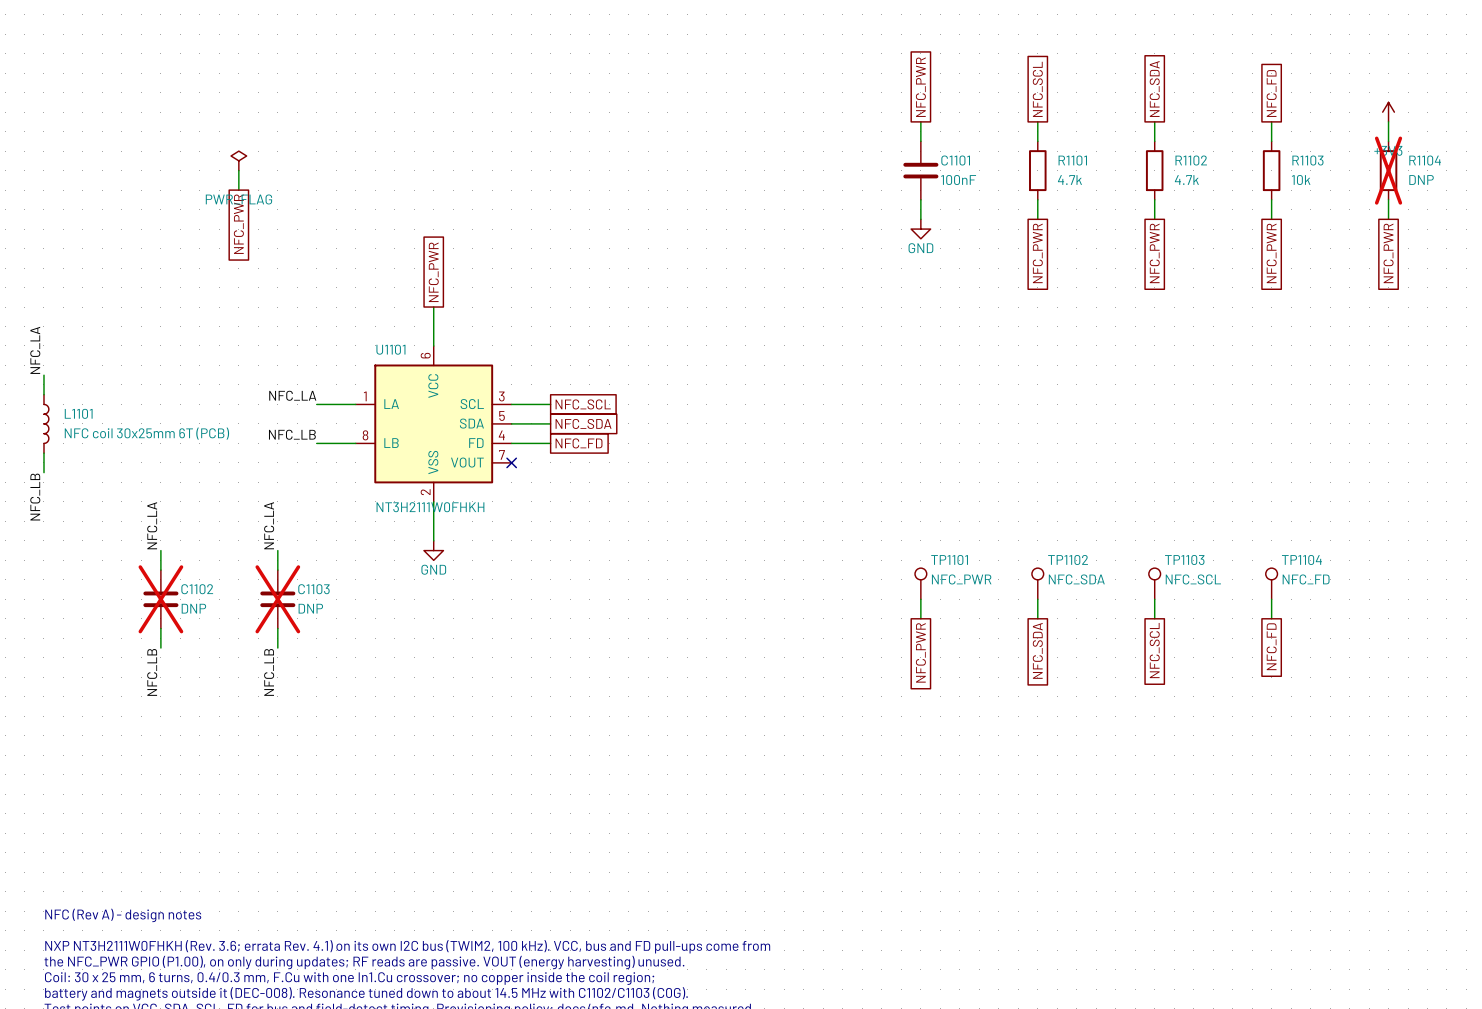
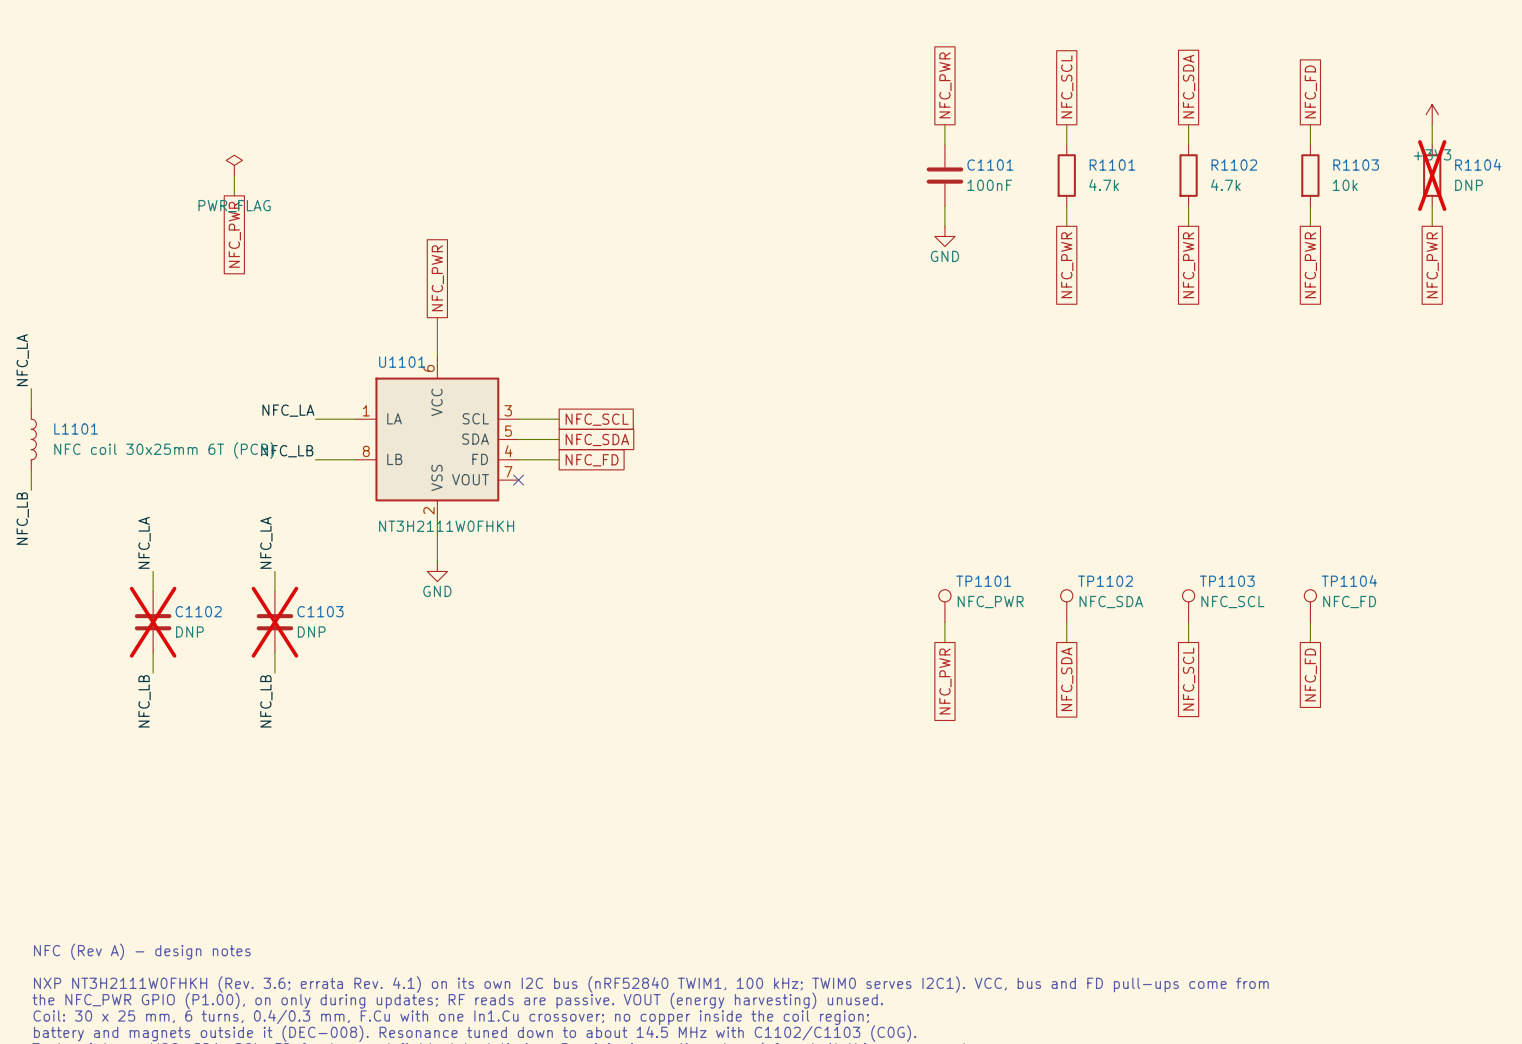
text: NXP NT3H2111W0FHKH (Rev. 3.6; errata Rev. 4.1) on its own I2C bus (TWIM2, 100 kHz). VCC, bus and FD pull-ups come from (407, 946) -> NXP NT3H2111W0FHKH (Rev. 3.6; errata Rev. 4.1) on its own I2C bus (nRF52840 TWIM1, 100 kHz; TWIM0 serves I2C1). VCC, bus and FD pull-ups come from (651, 984)

